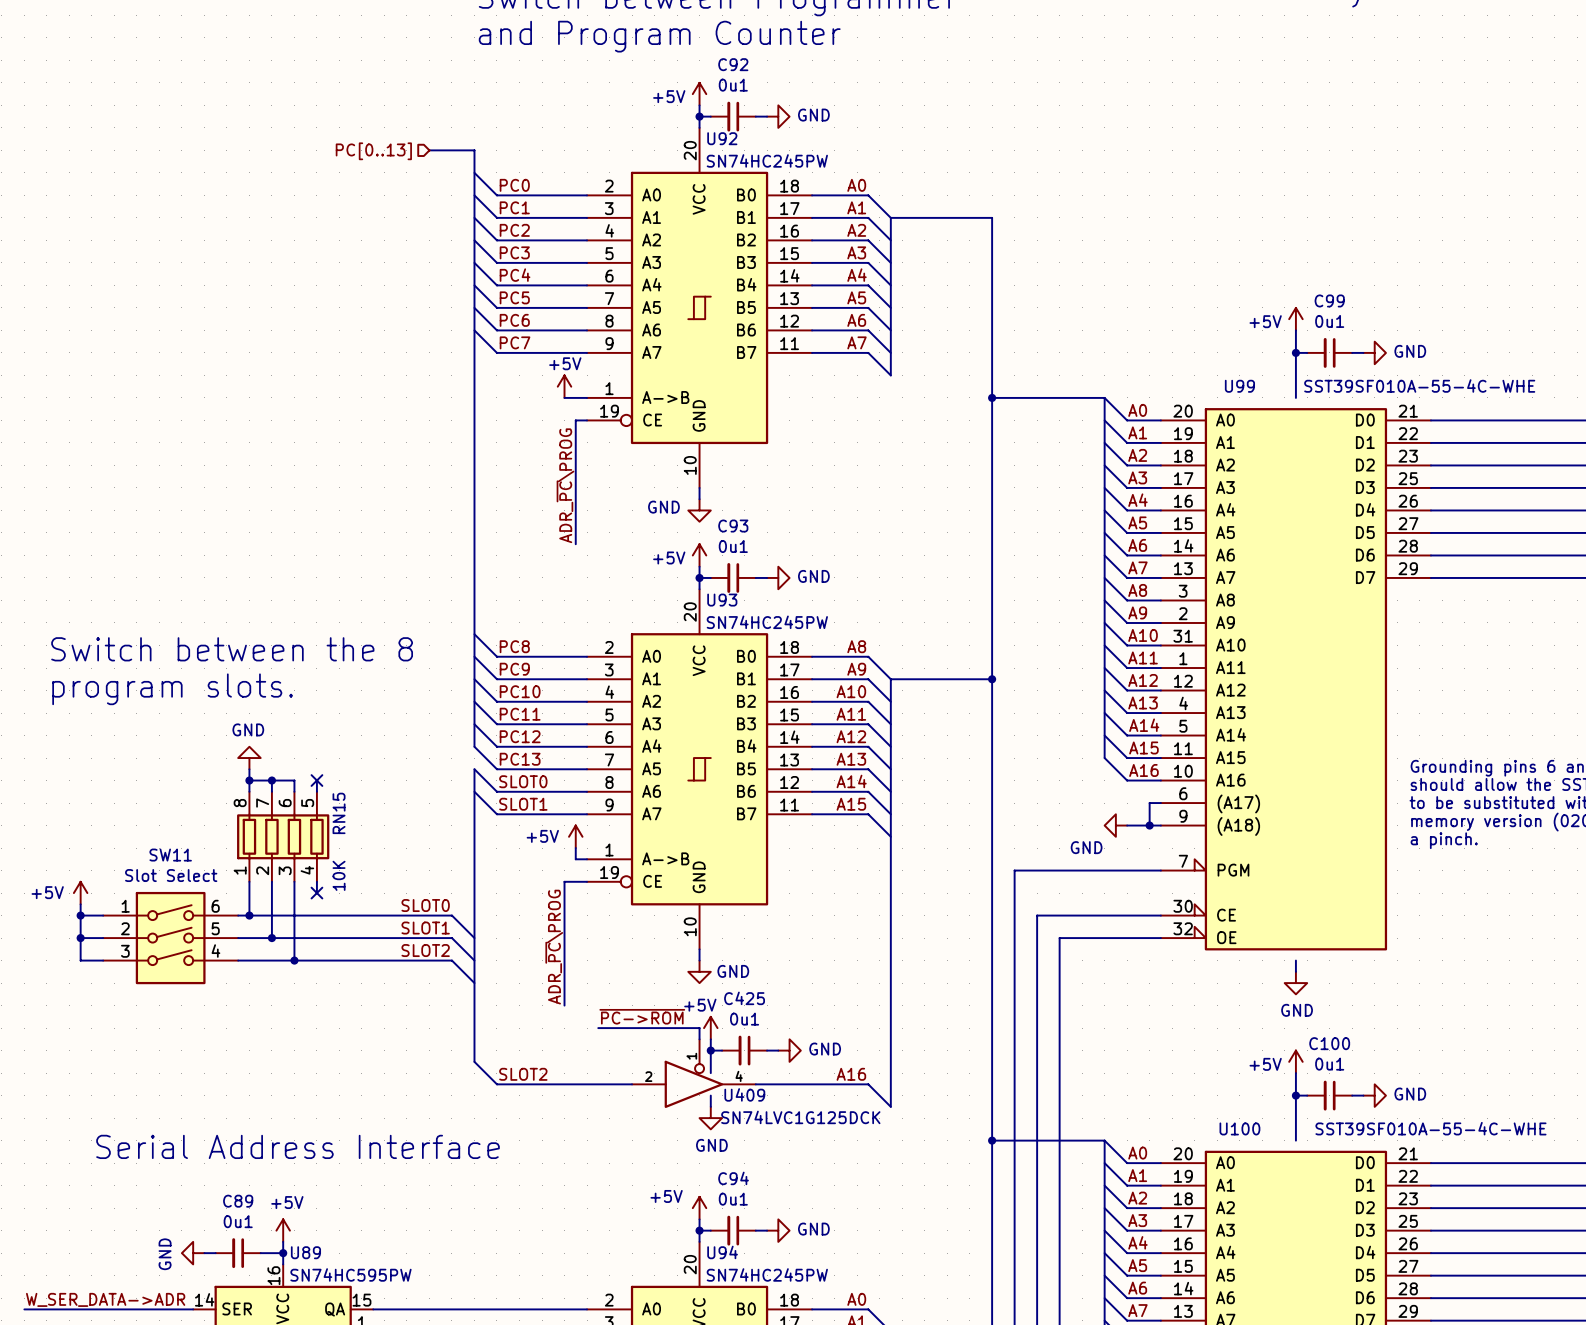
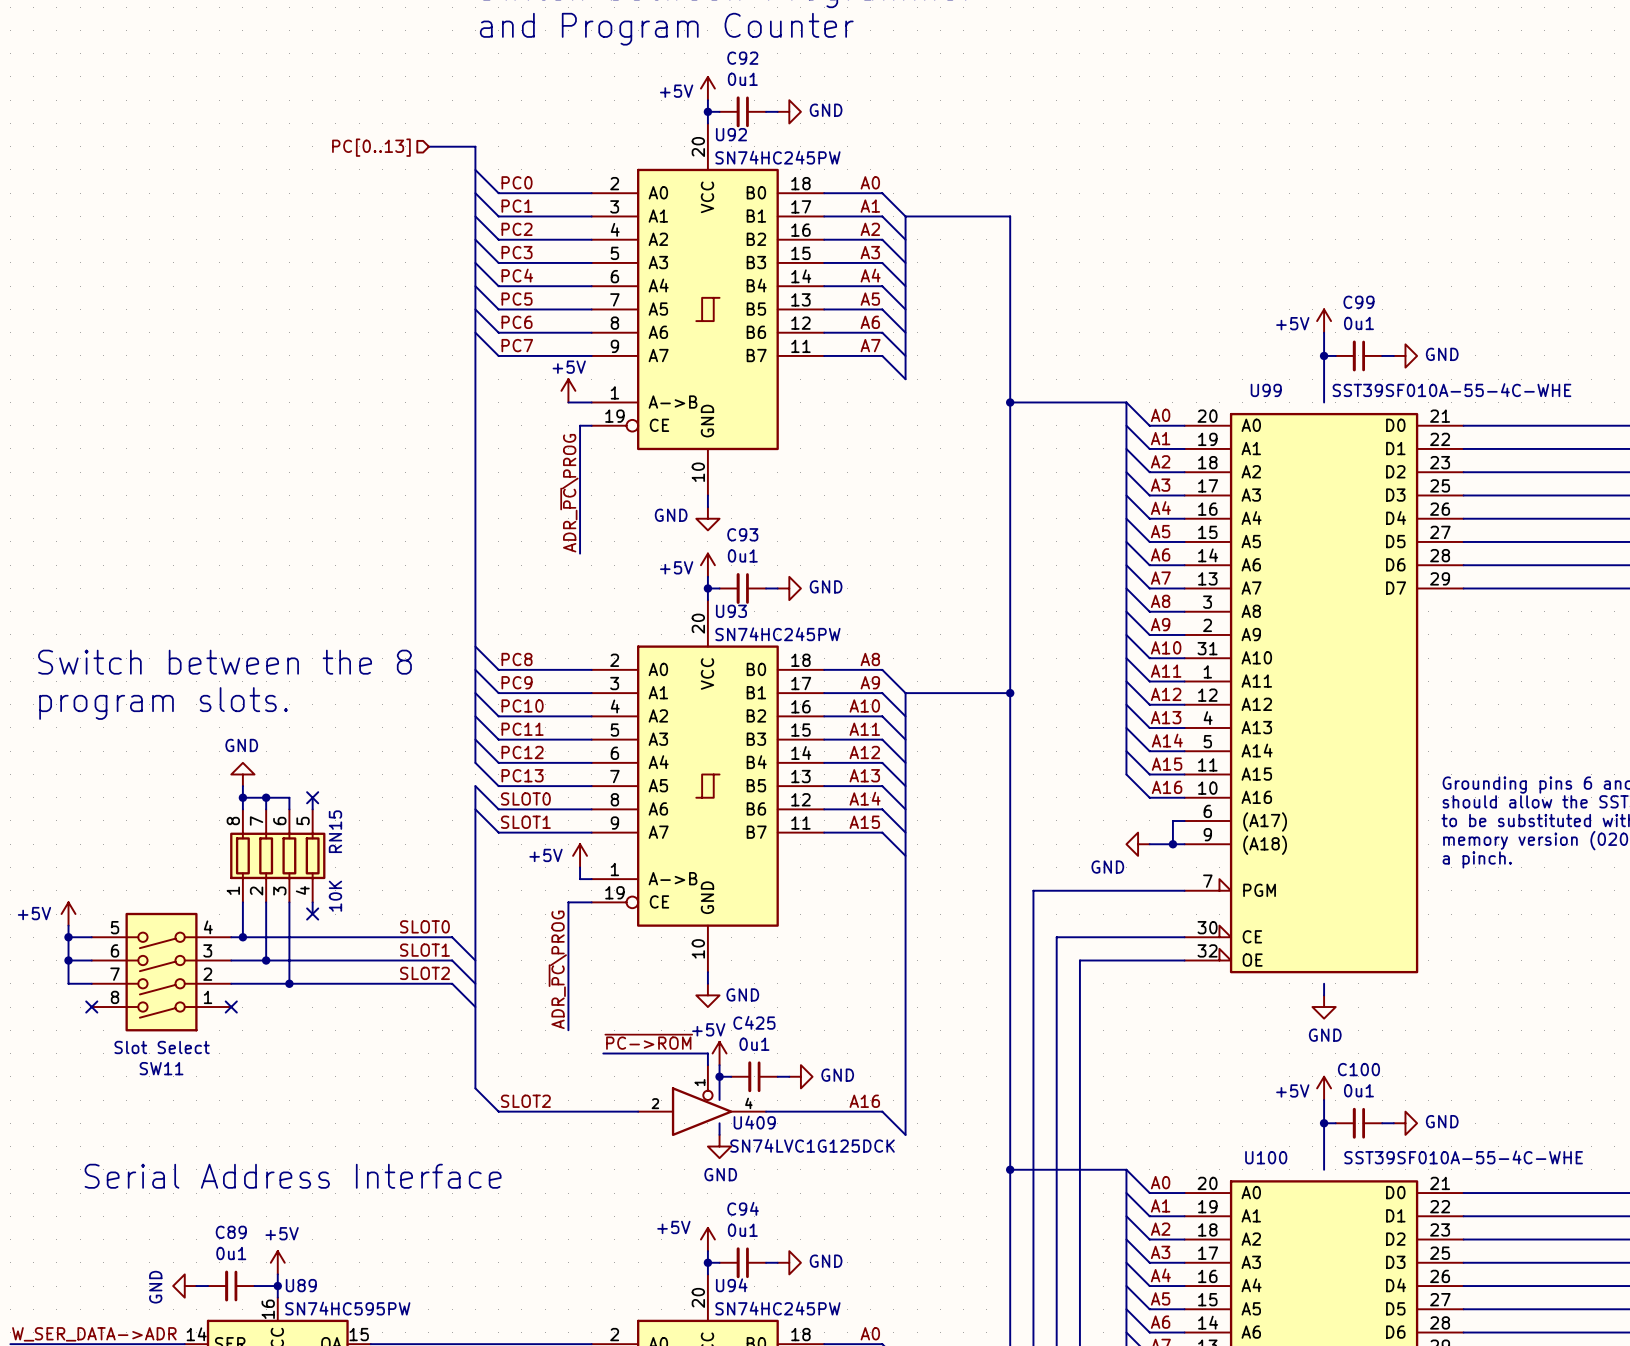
SW11 name position: SW11 (170, 855) -> SW11 (161, 1068)
SW11 value position: Slot Select (171, 875) -> Slot Select (162, 1047)
SW11 symbol: [103, 891, 239, 985] -> [91, 912, 232, 1032]
no-connect mark: none -> (91, 1007)
no-connect mark: none -> (231, 1007)

